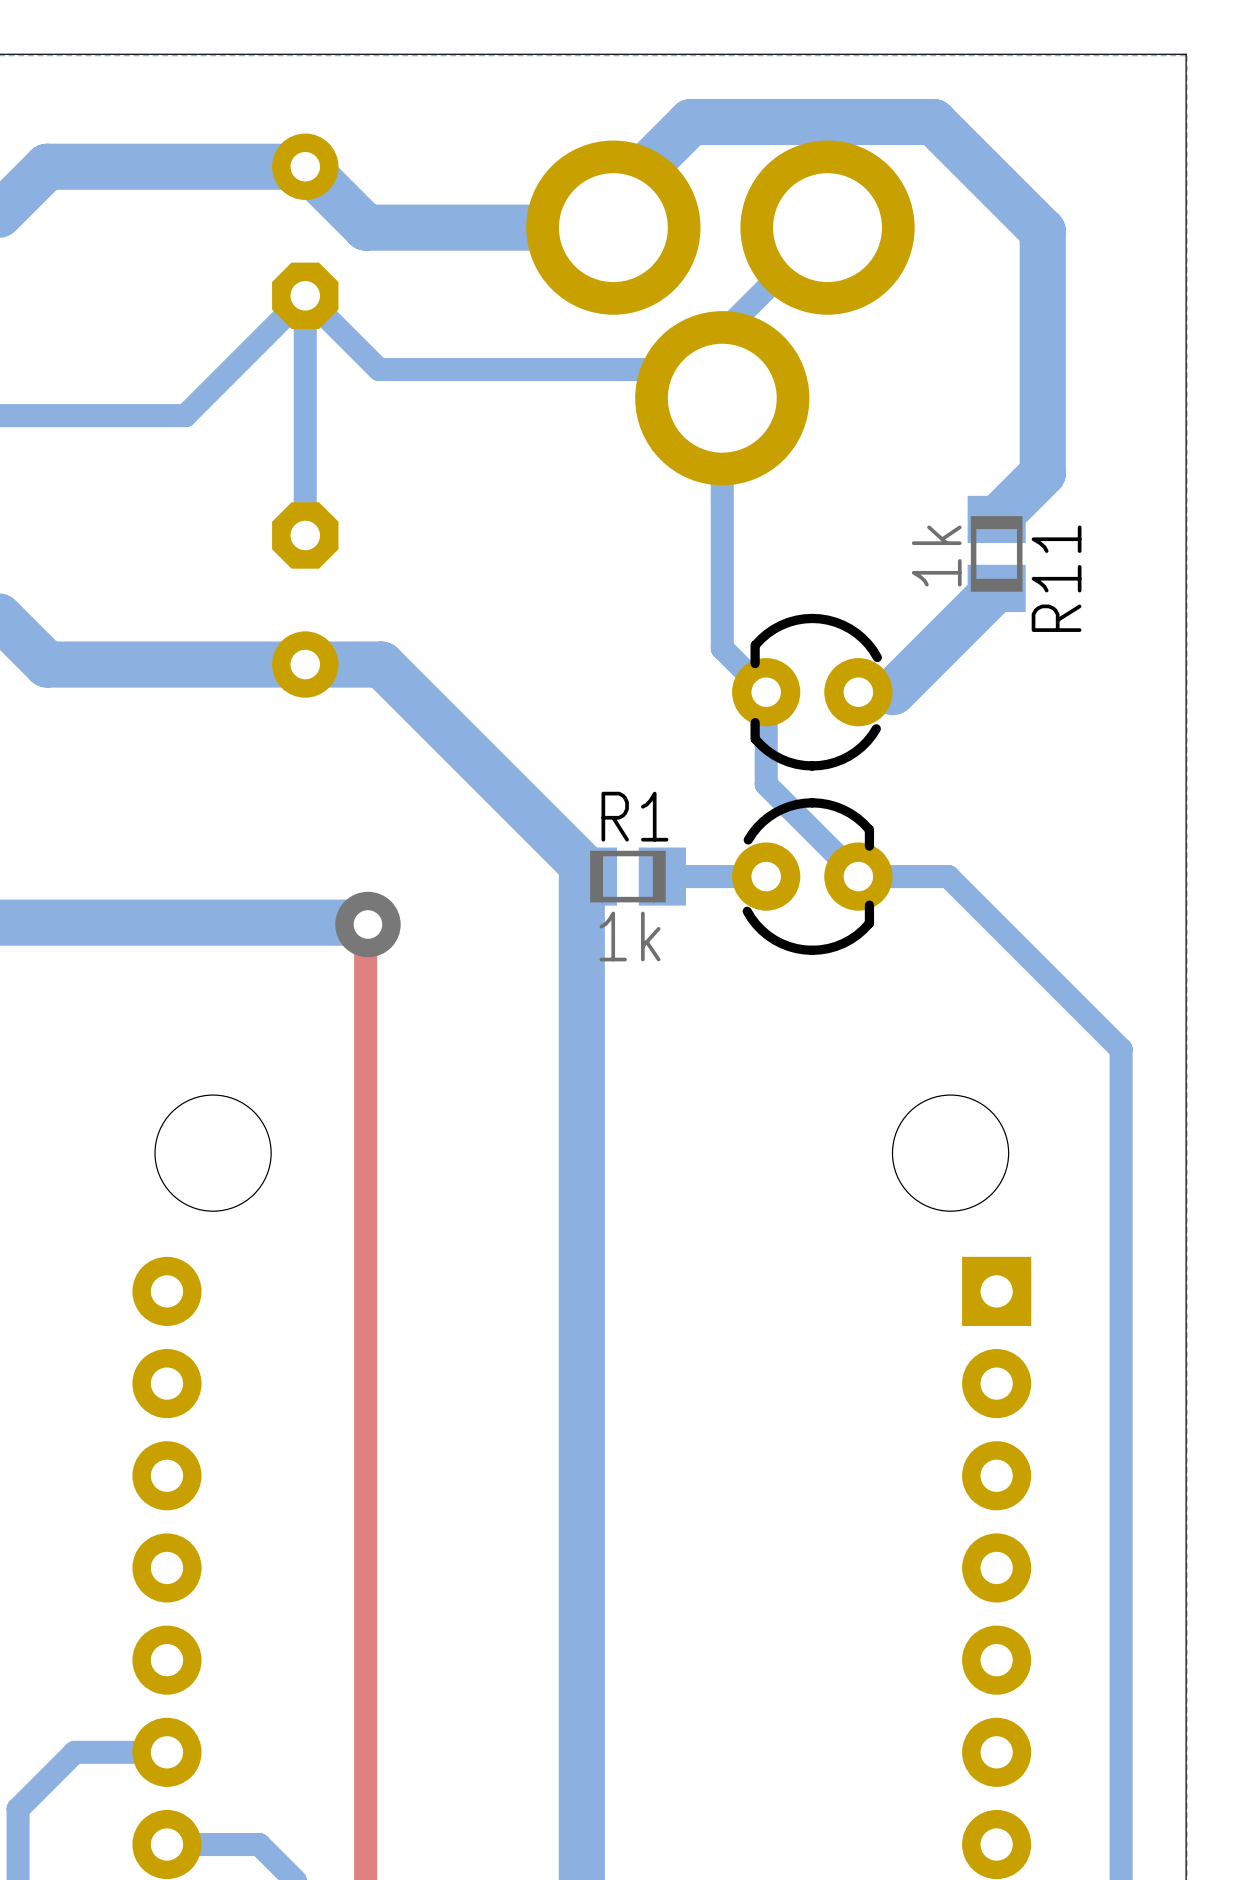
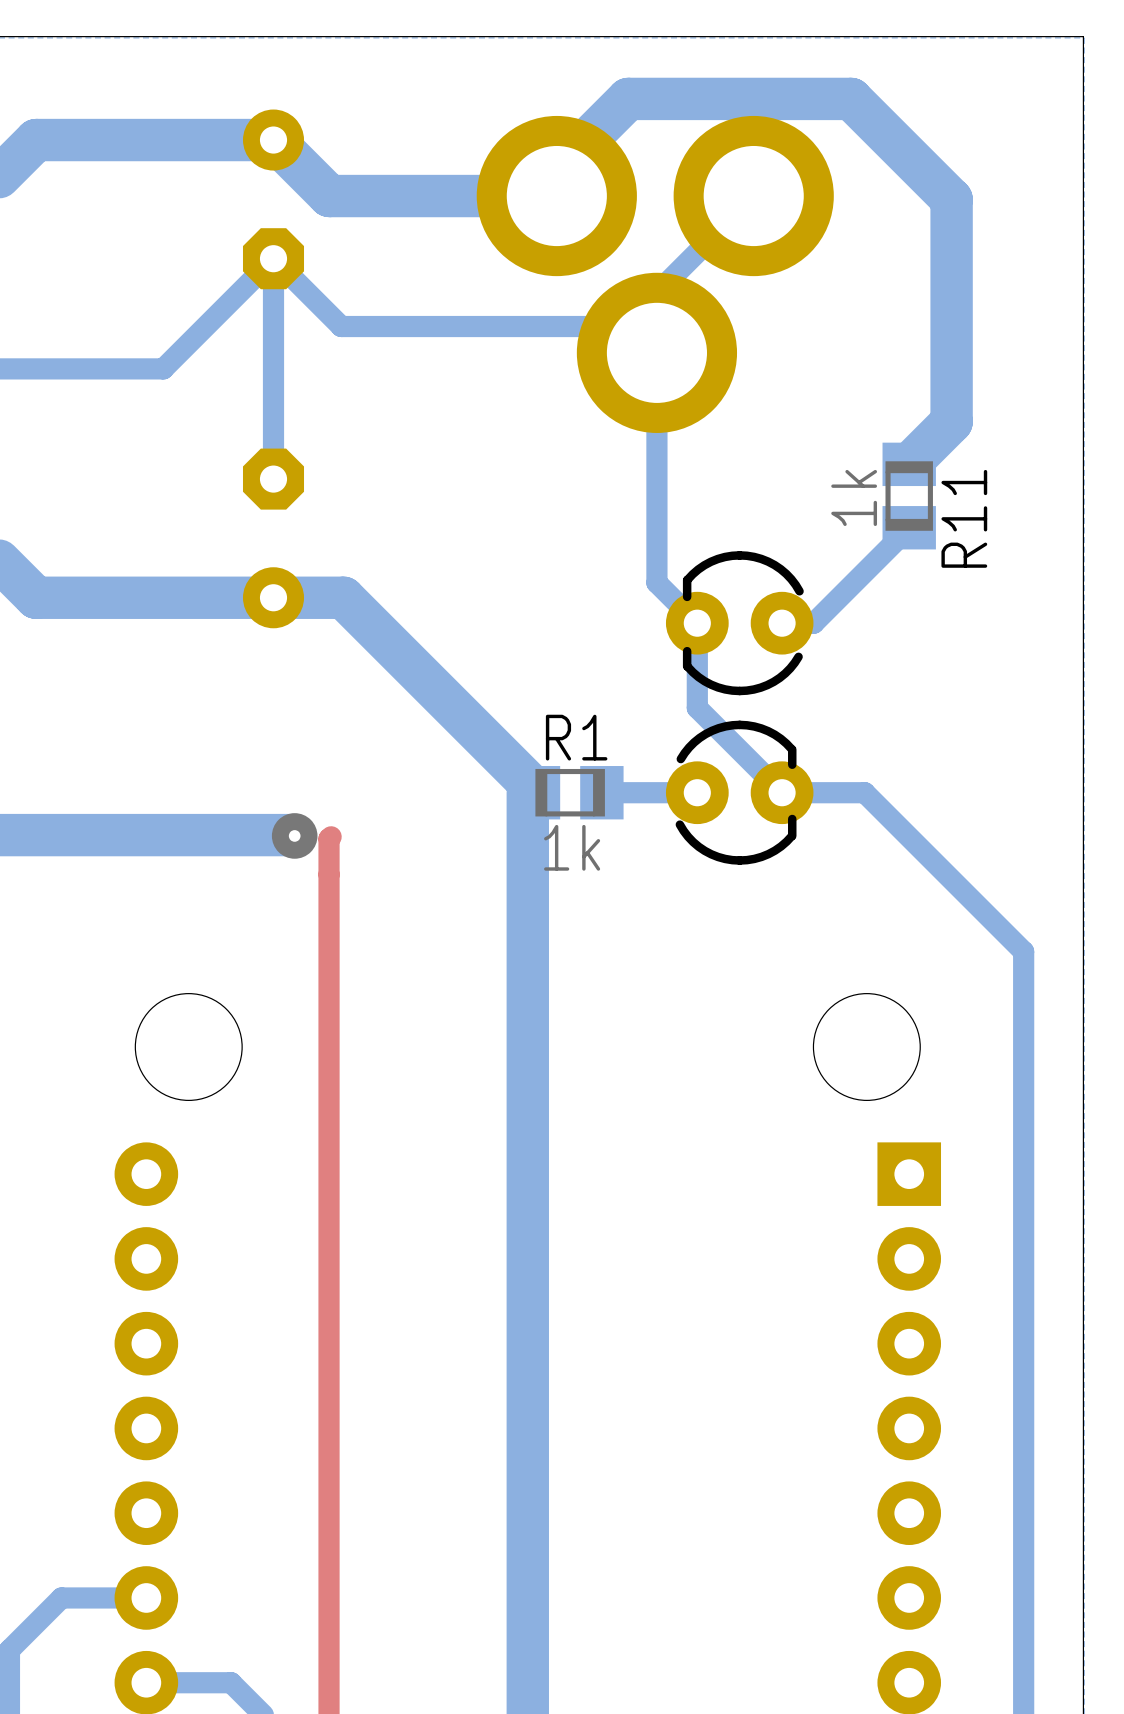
bottom track width: thick (996, 588) (892, 692) -> thin (909, 527) (813, 623)
via: none -> (294, 835)
via: (367, 924) -> none

